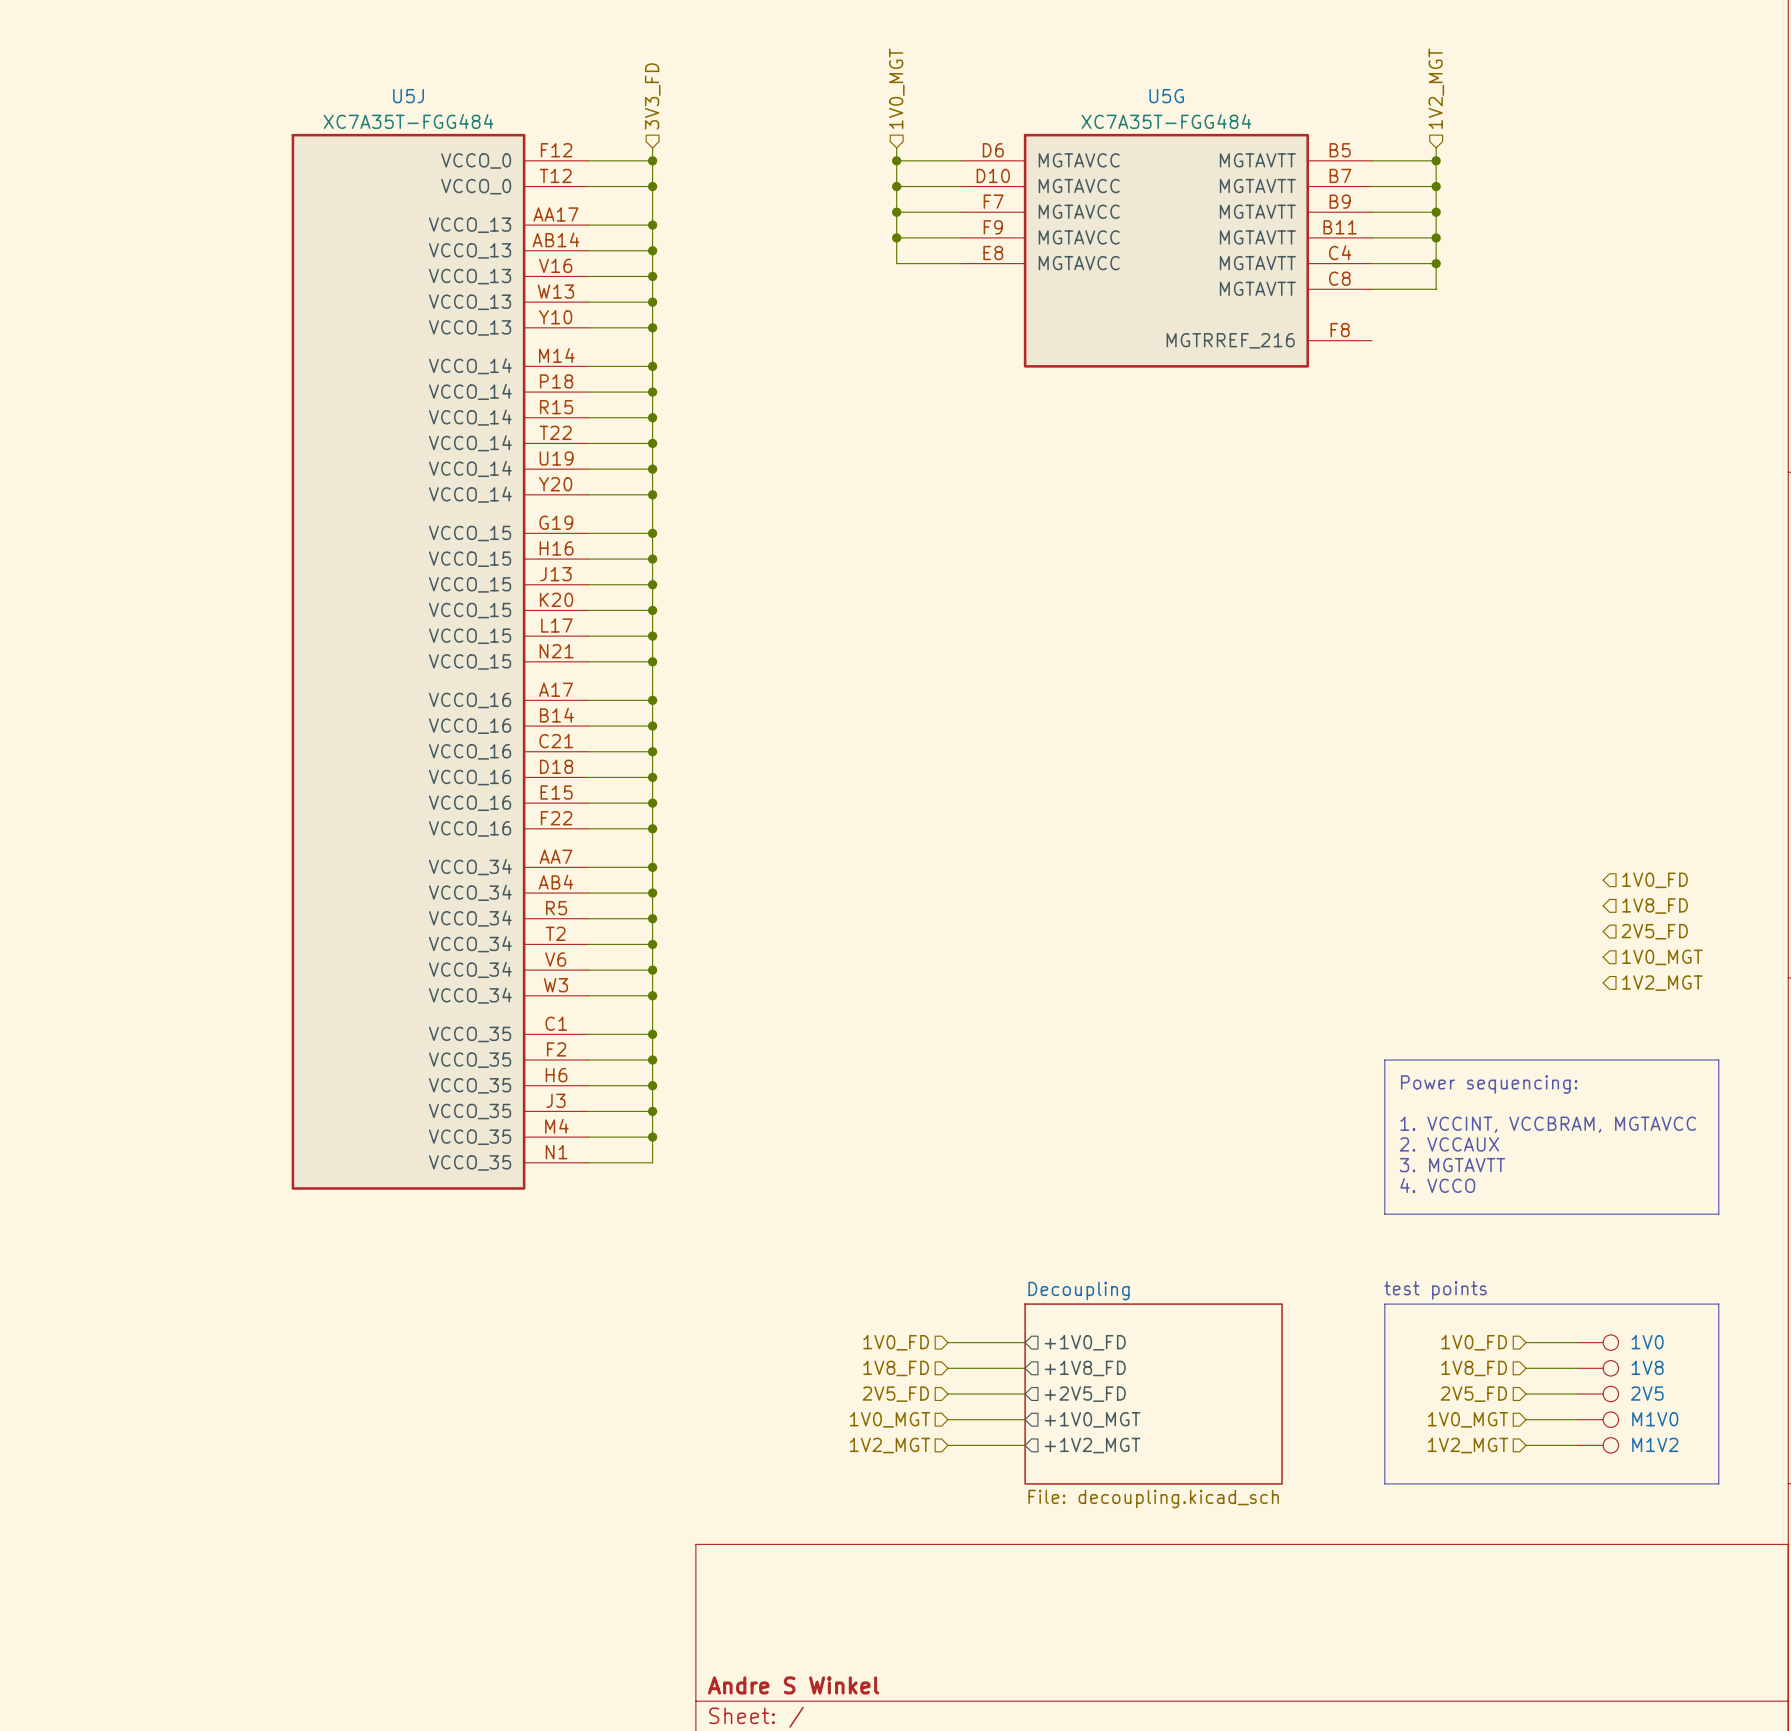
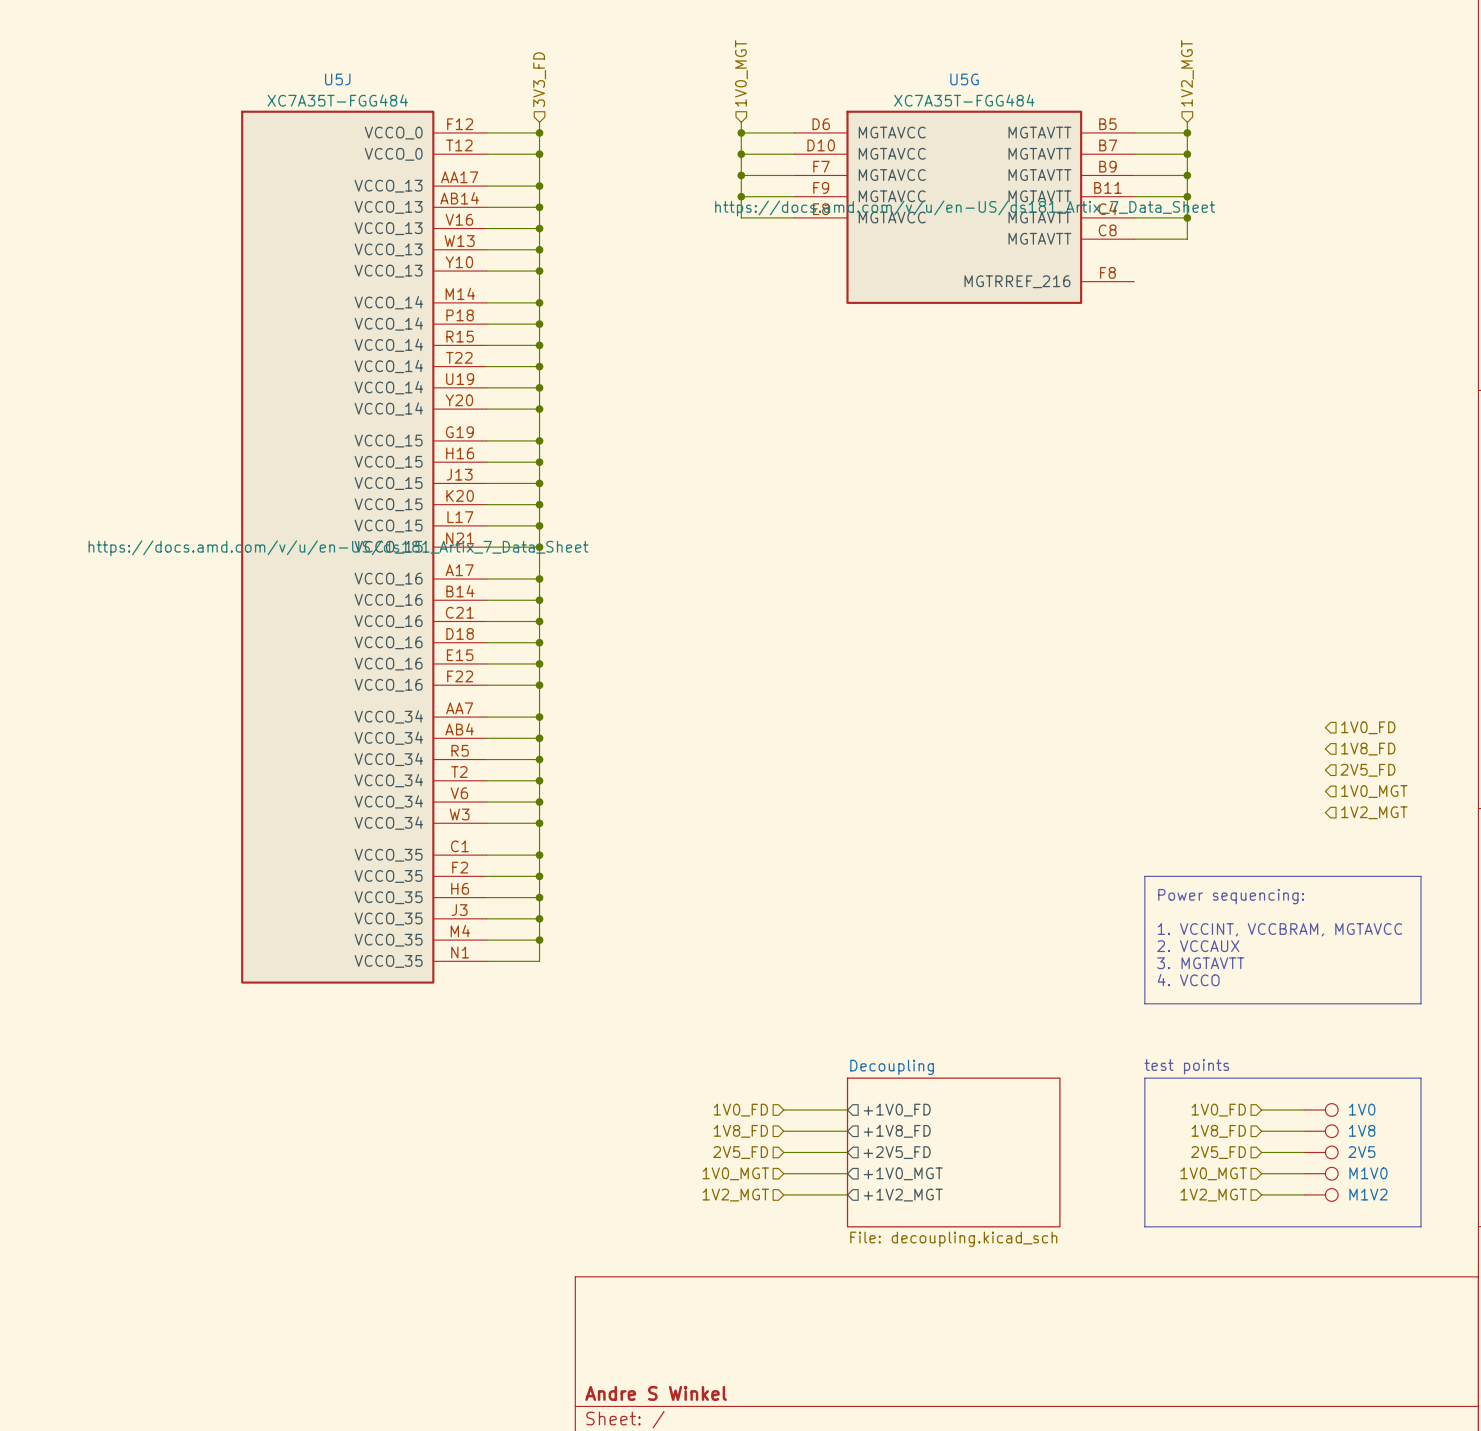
U5G text: none -> https://docs.amd.com/v/u/en-US/ds181_Artix_7_Data_Sheet (965, 208)
U5J text: none -> https://docs.amd.com/v/u/en-US/ds181_Artix_7_Data_Sheet (338, 548)

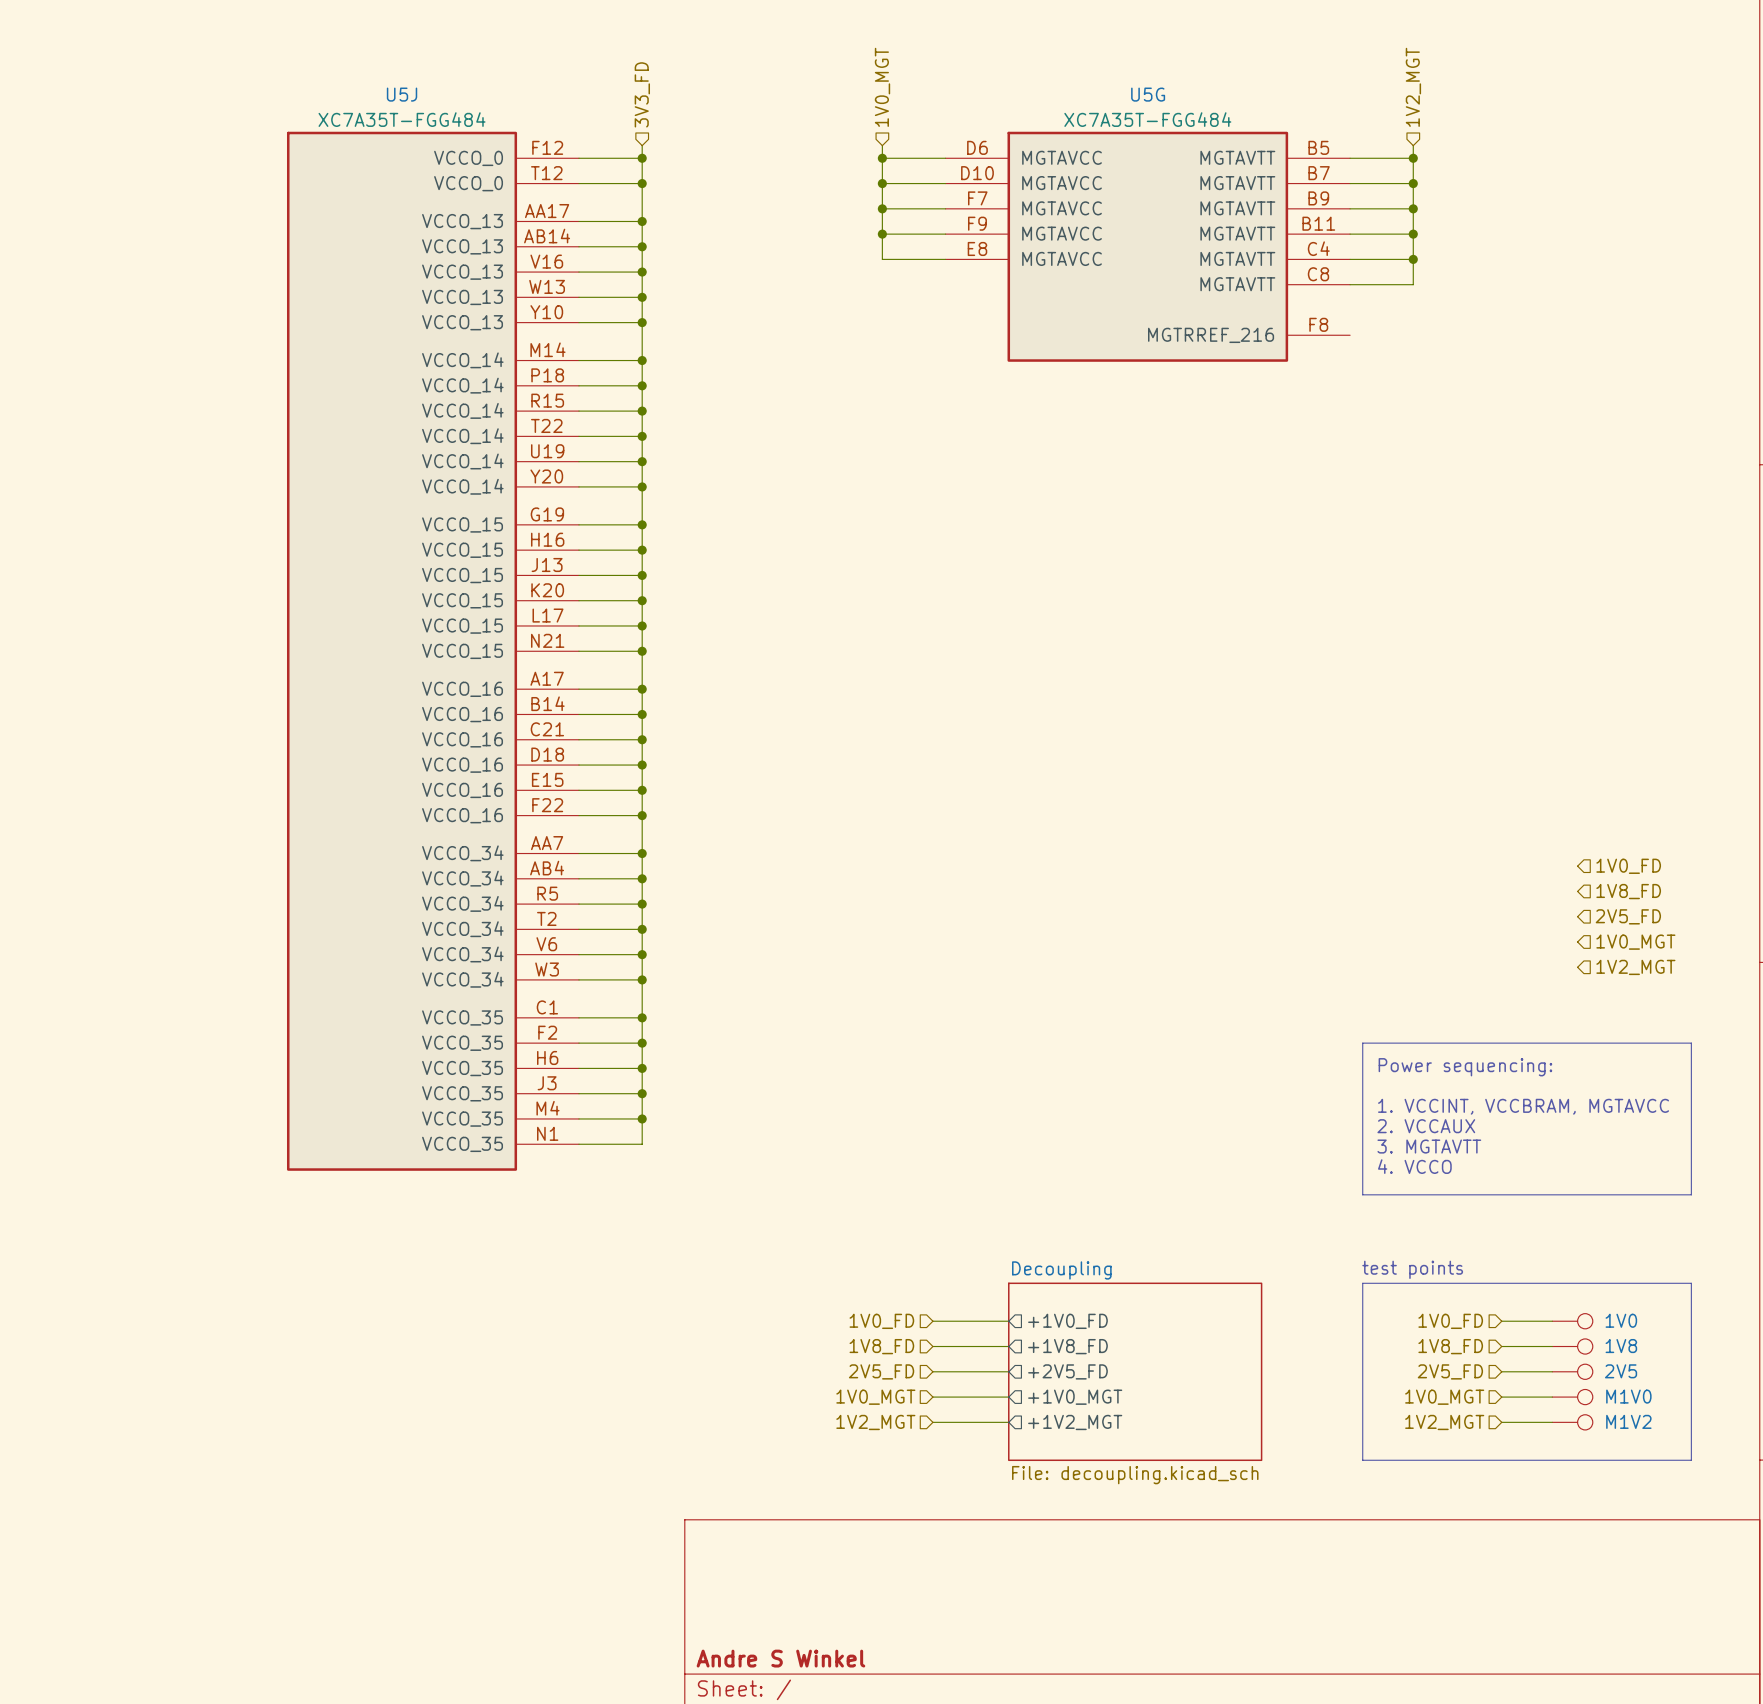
U5G text: https://docs.amd.com/v/u/en-US/ds181_Artix_7_Data_Sheet (965, 208) -> none
U5J text: https://docs.amd.com/v/u/en-US/ds181_Artix_7_Data_Sheet (338, 548) -> none

